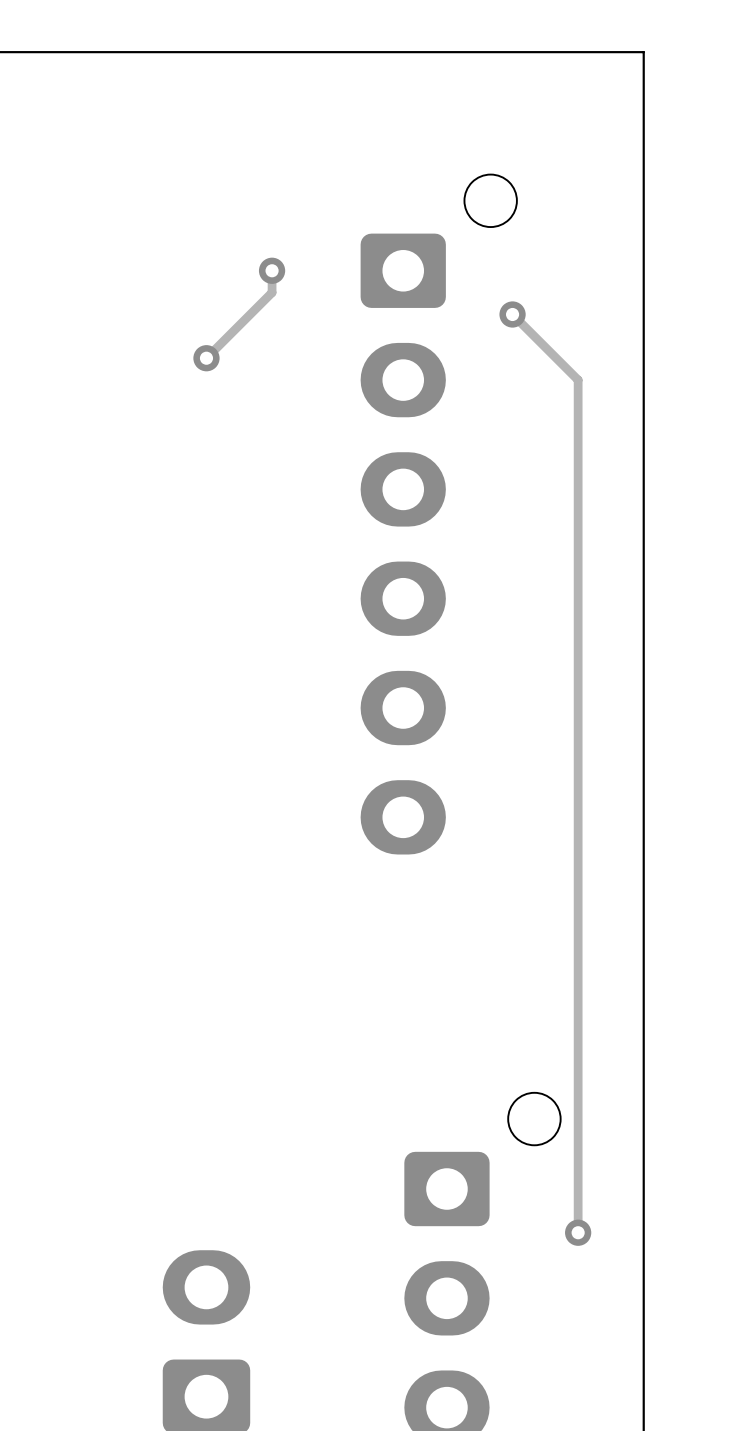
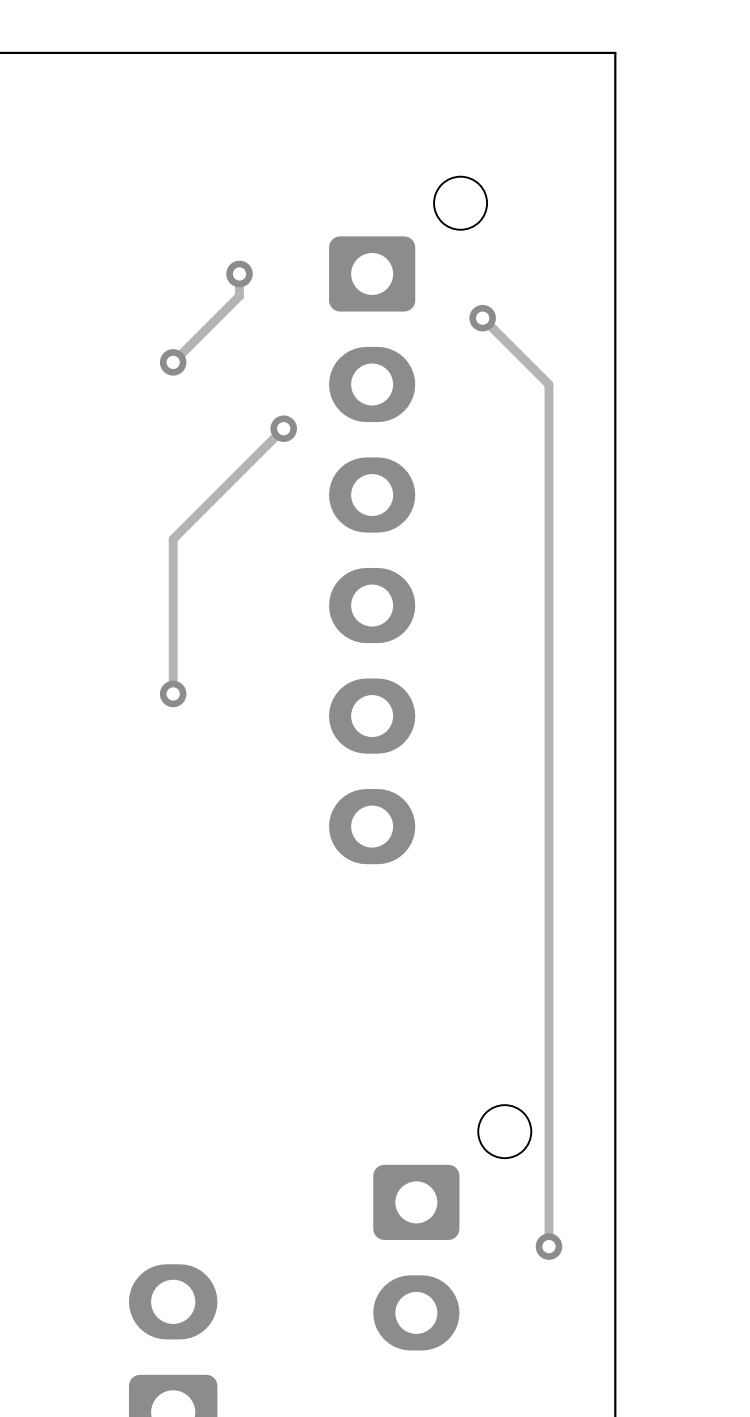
track: none -> (283, 428) (173, 539) (173, 693)
via: none -> (283, 428)
via: none -> (173, 693)

